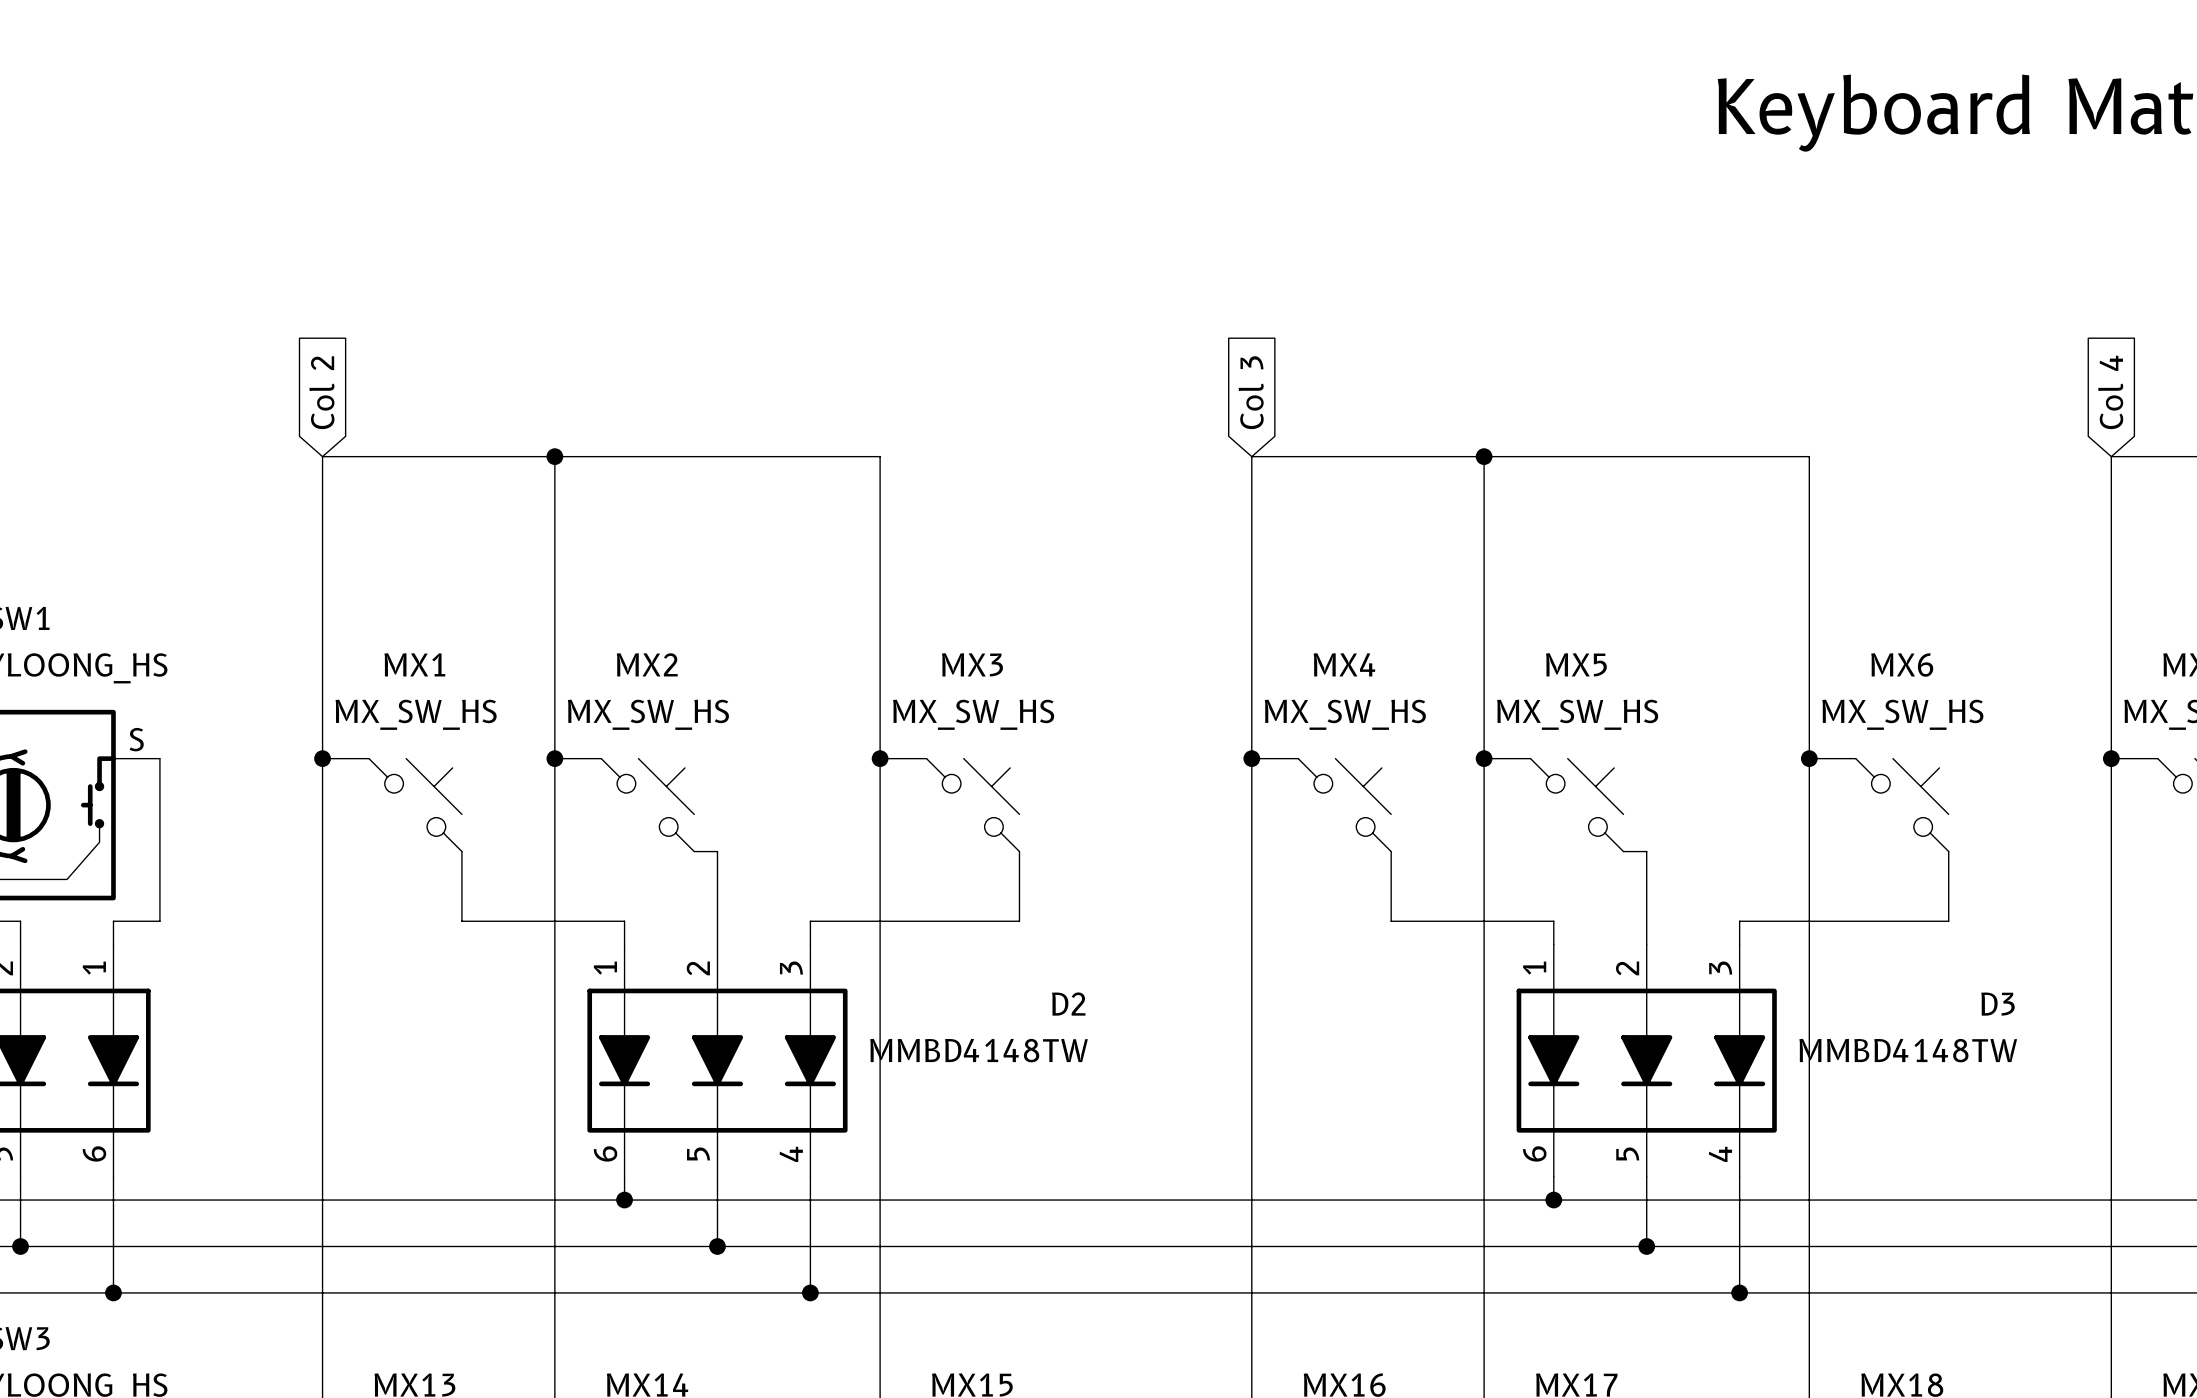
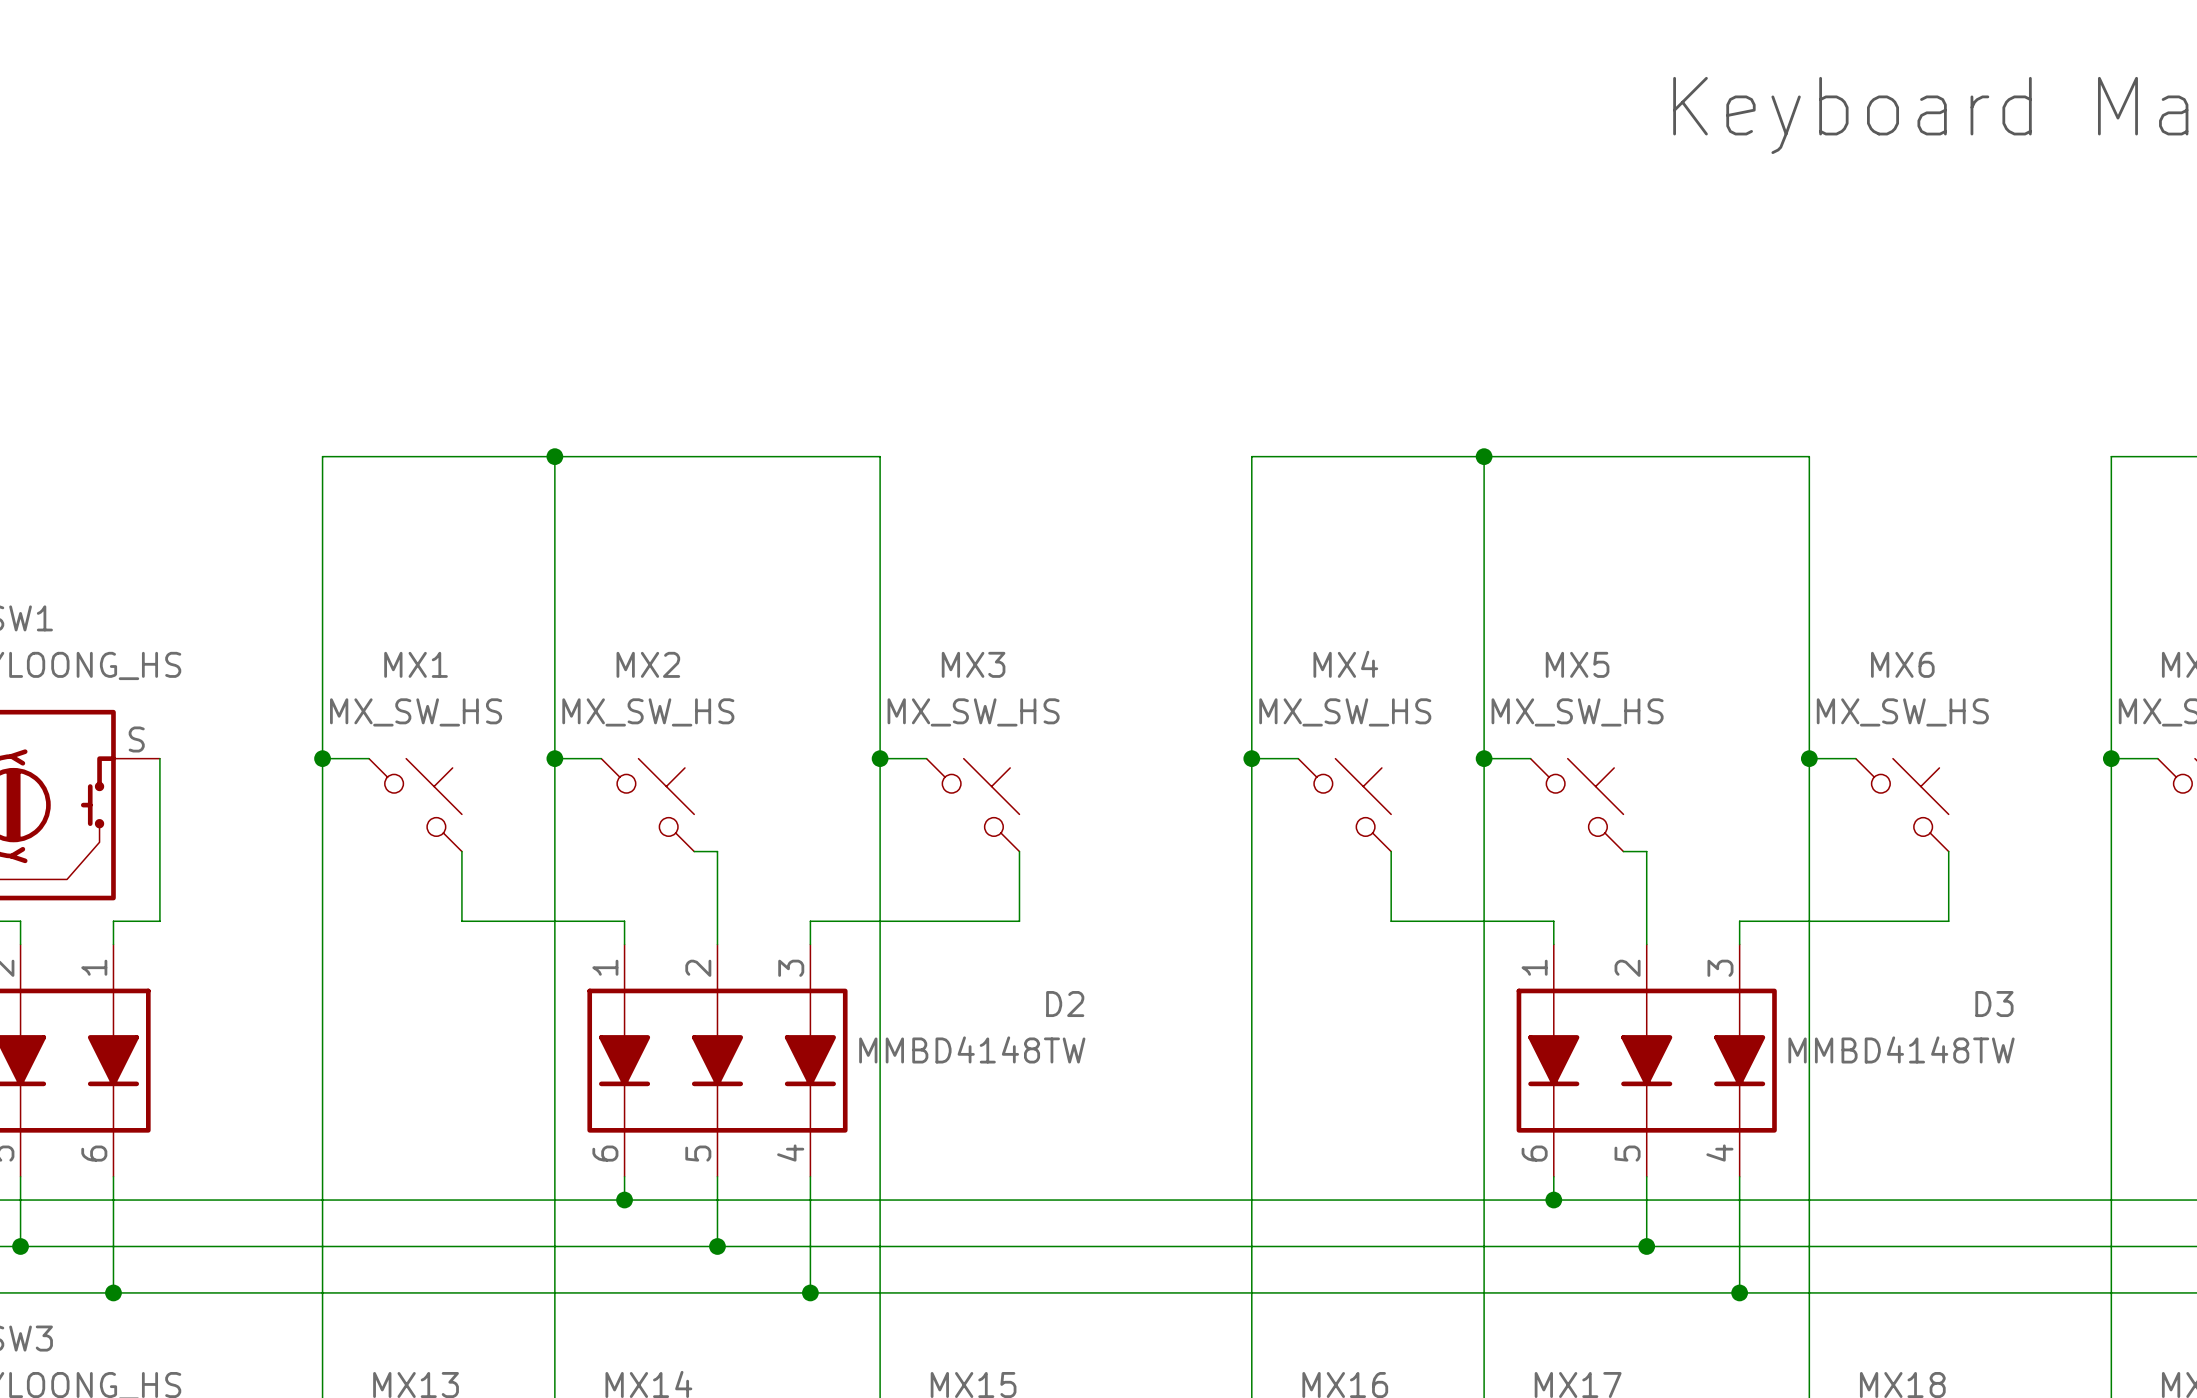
global label: Col 2 (321, 392) -> none
global label: Col 3 (1251, 392) -> none
global label: Col 4 (2110, 392) -> none

